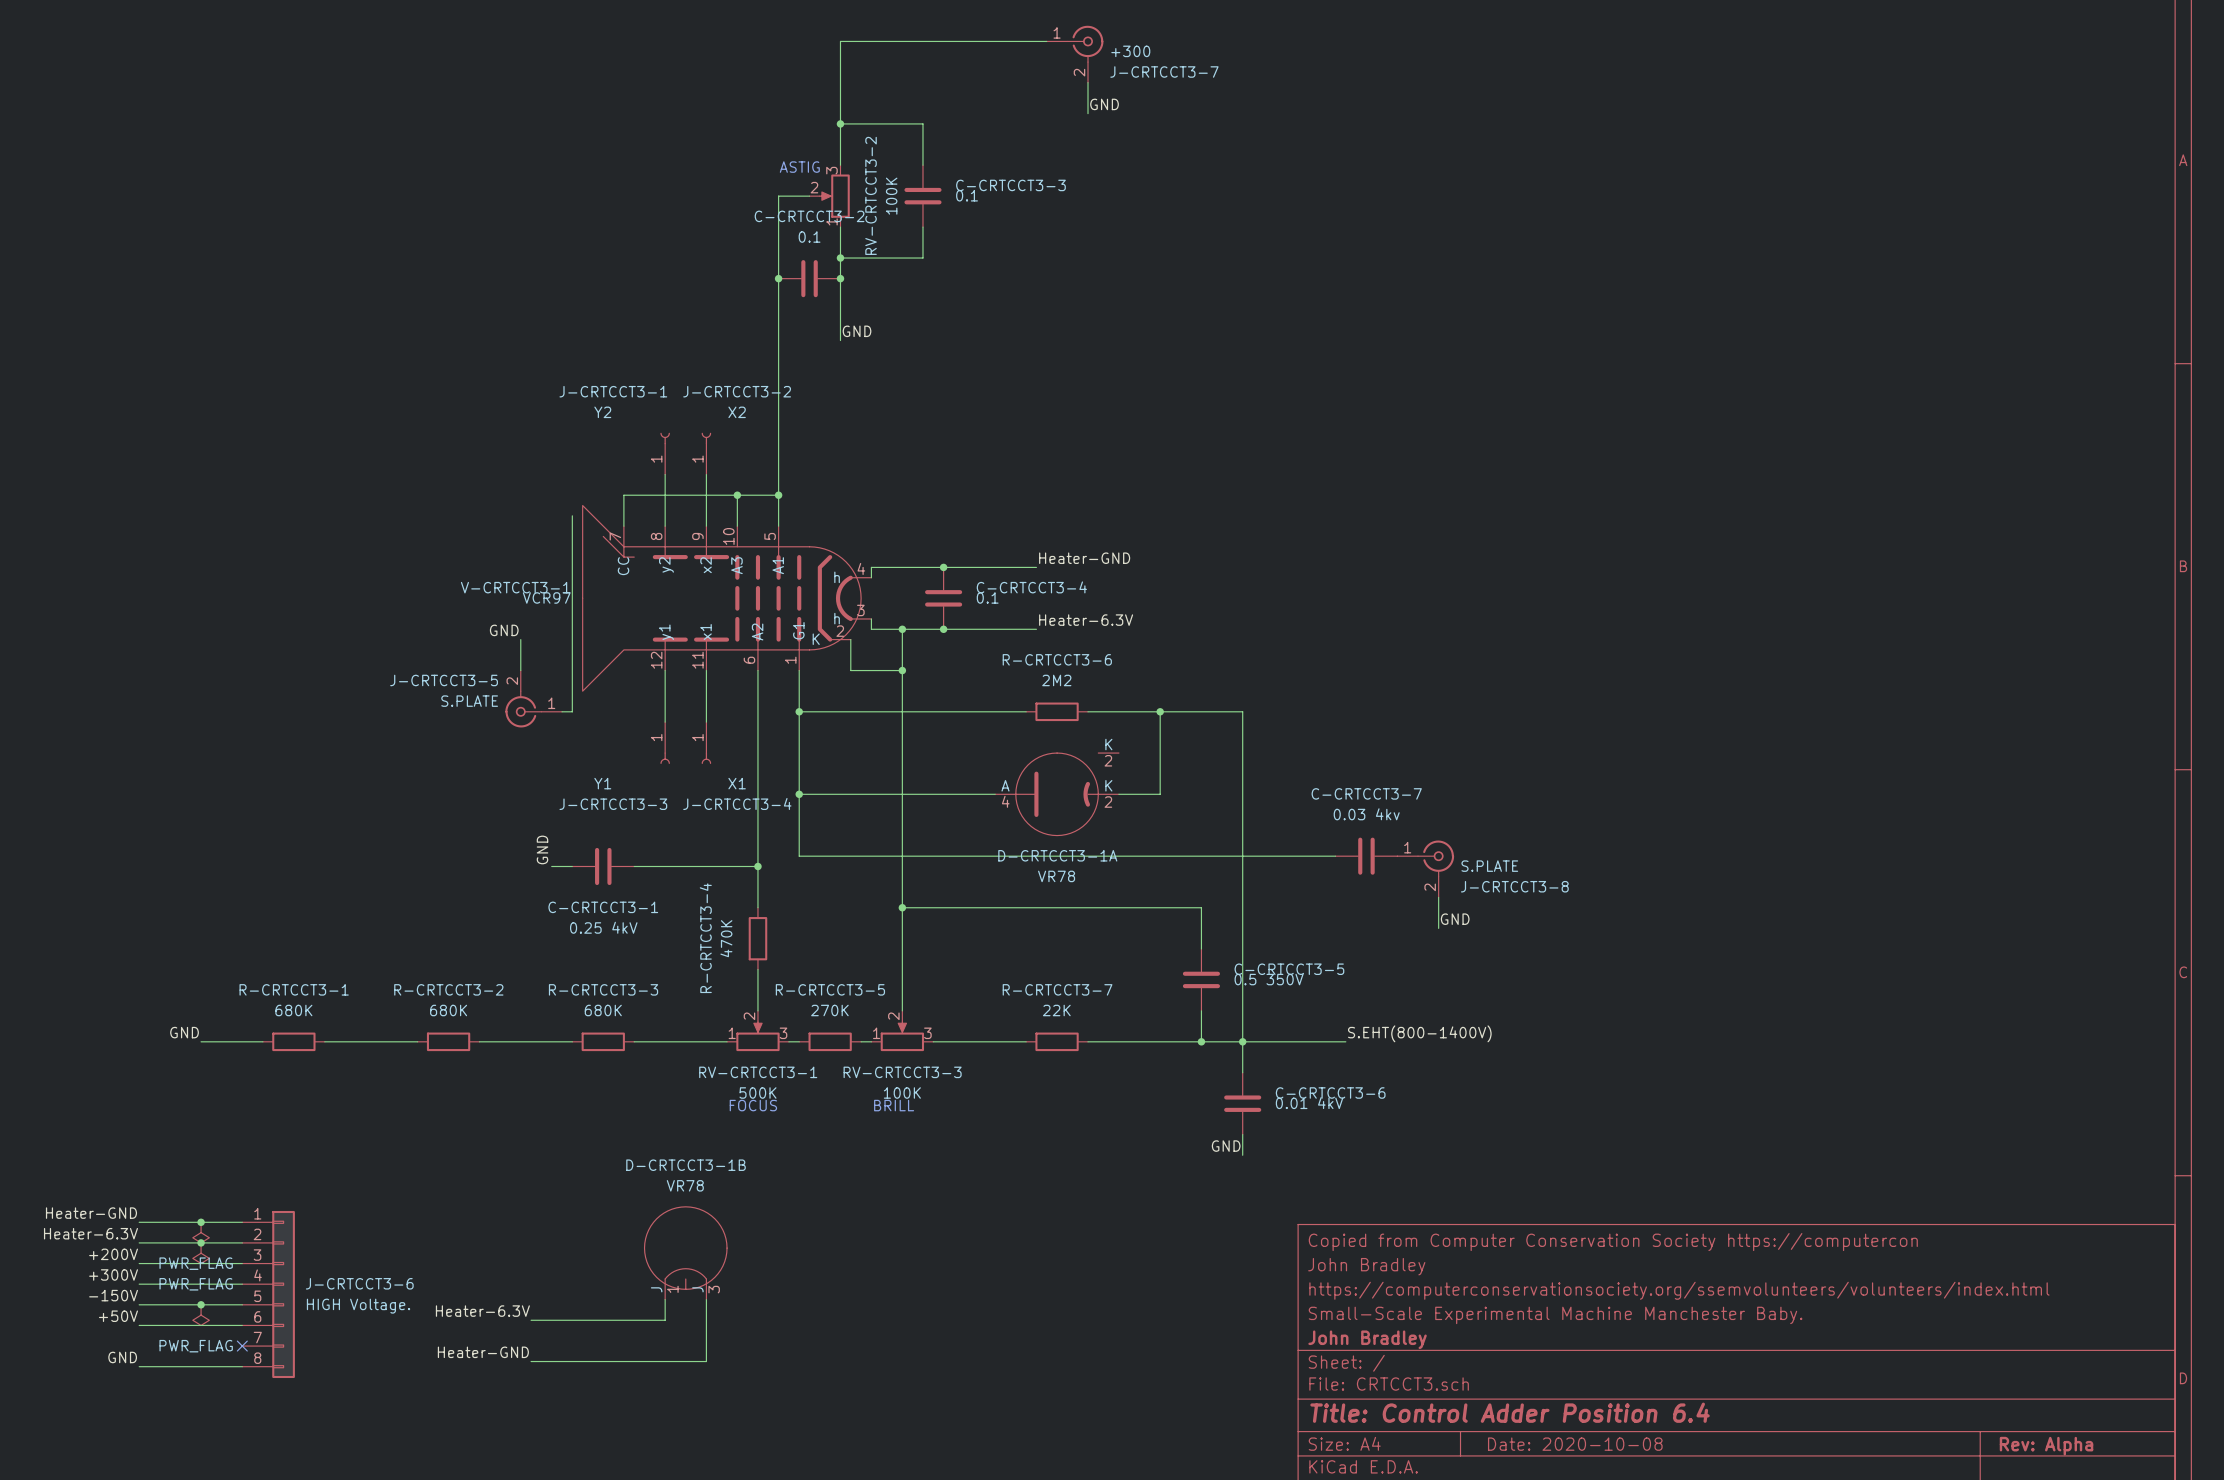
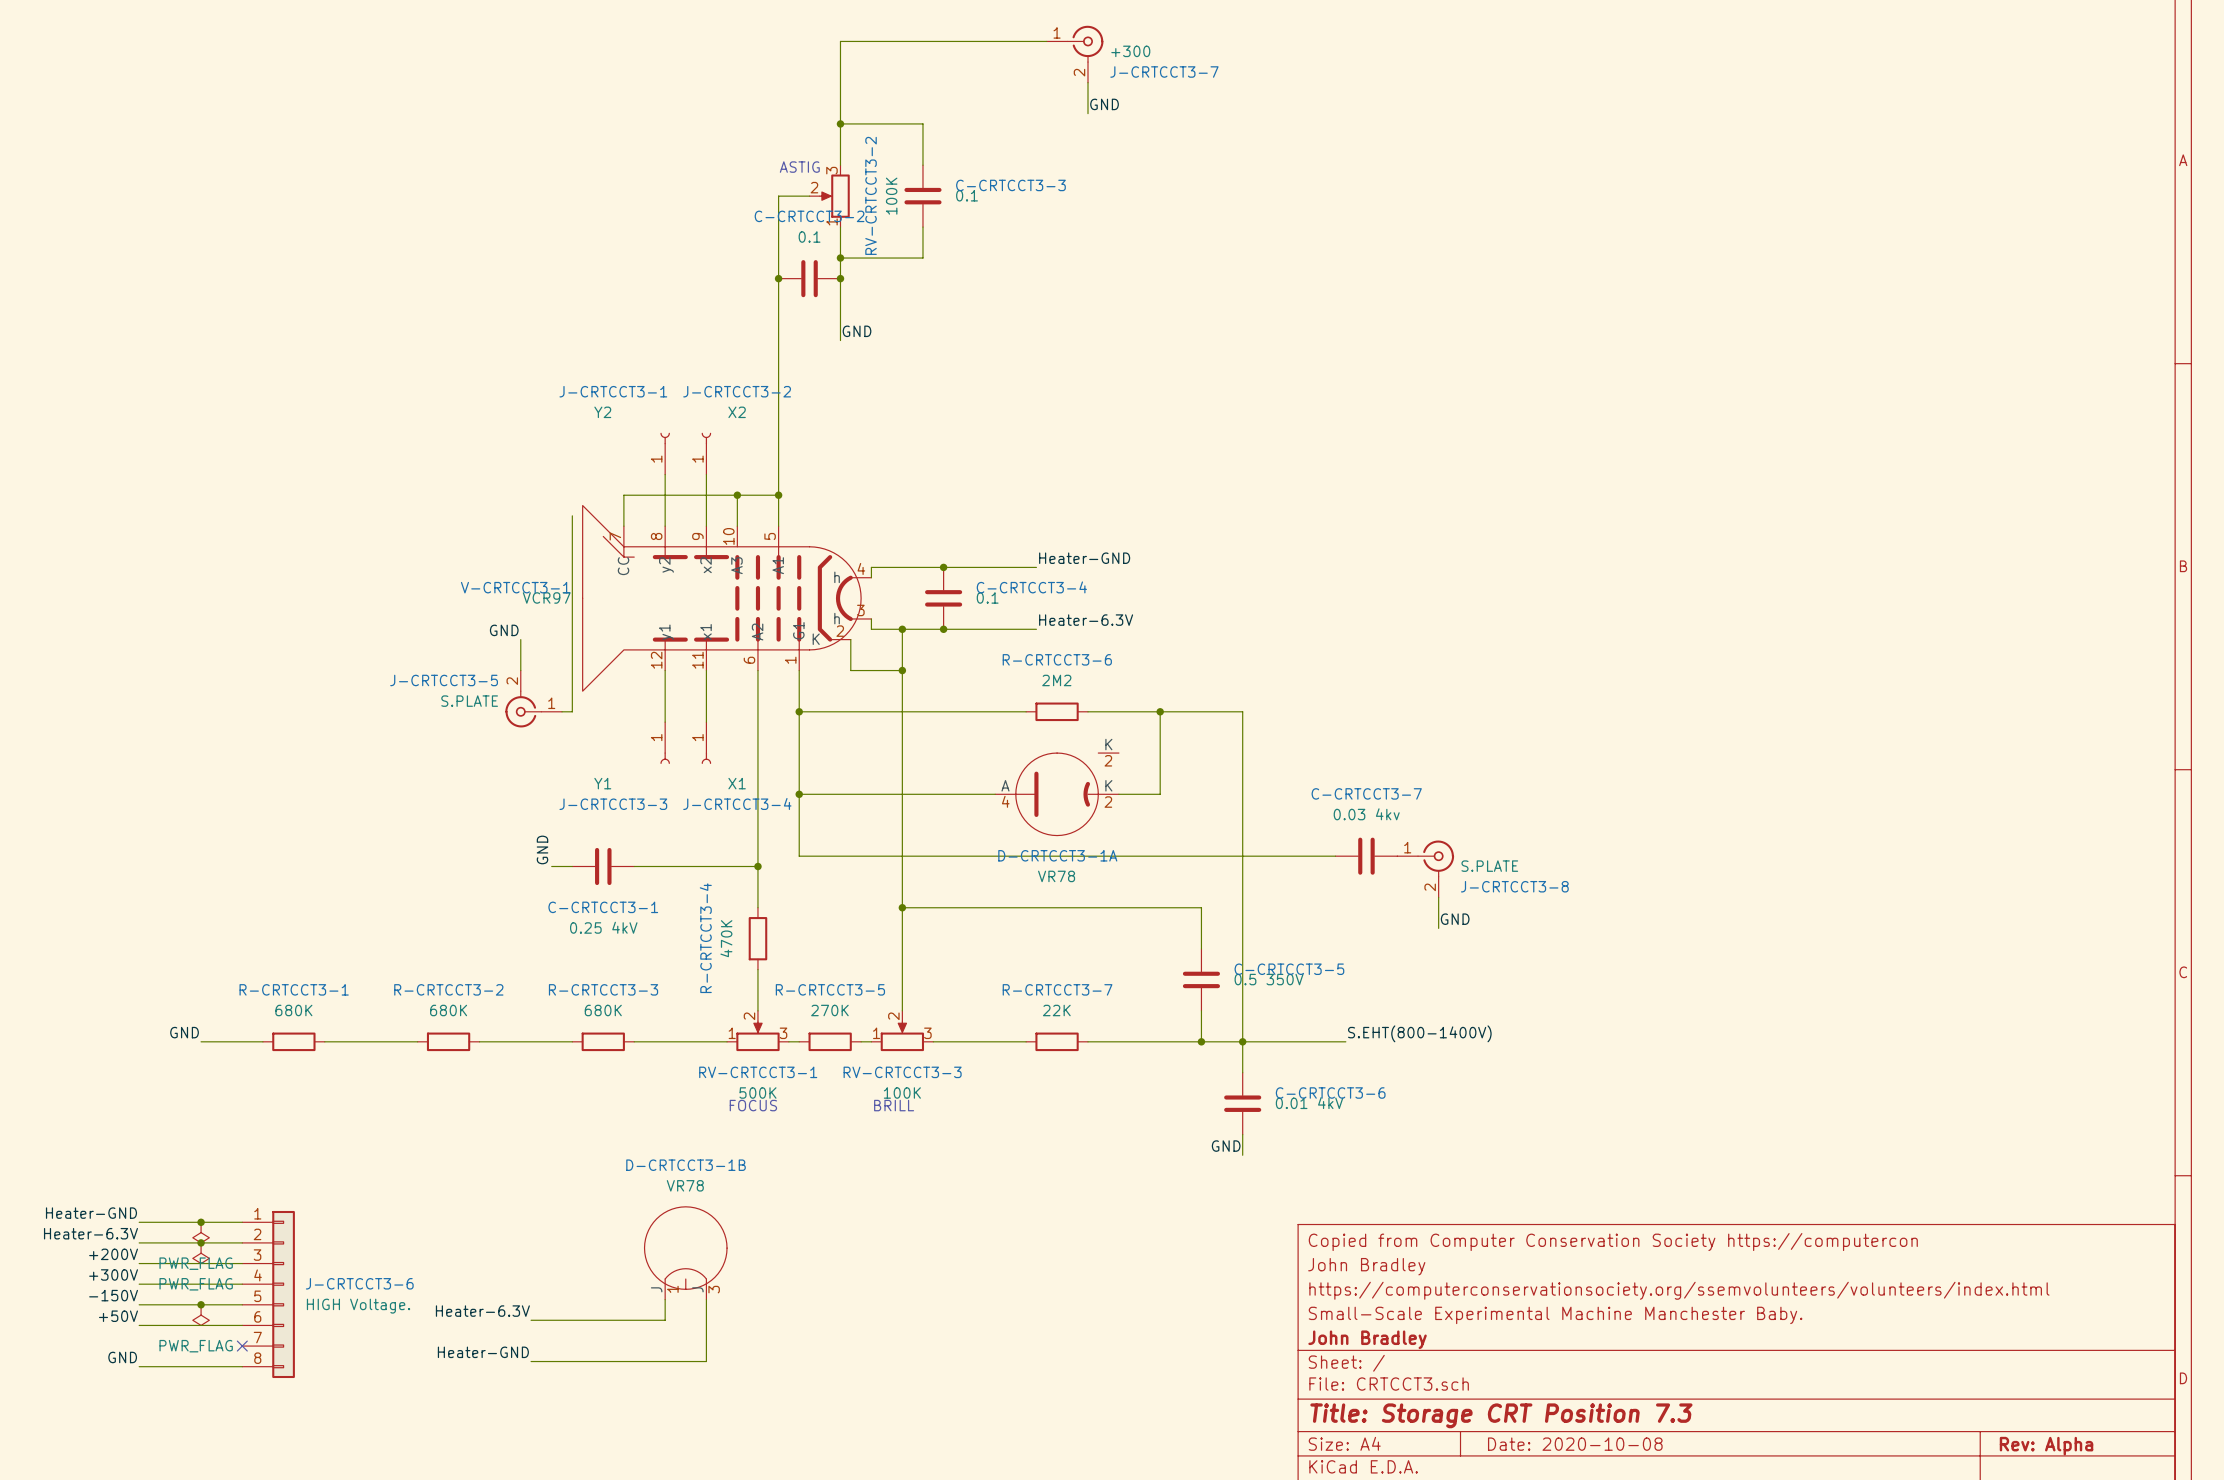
title block: Title: Control Adder Position 6.4 (1510, 1412) -> Title: Storage CRT Position 7.3 (1501, 1415)

